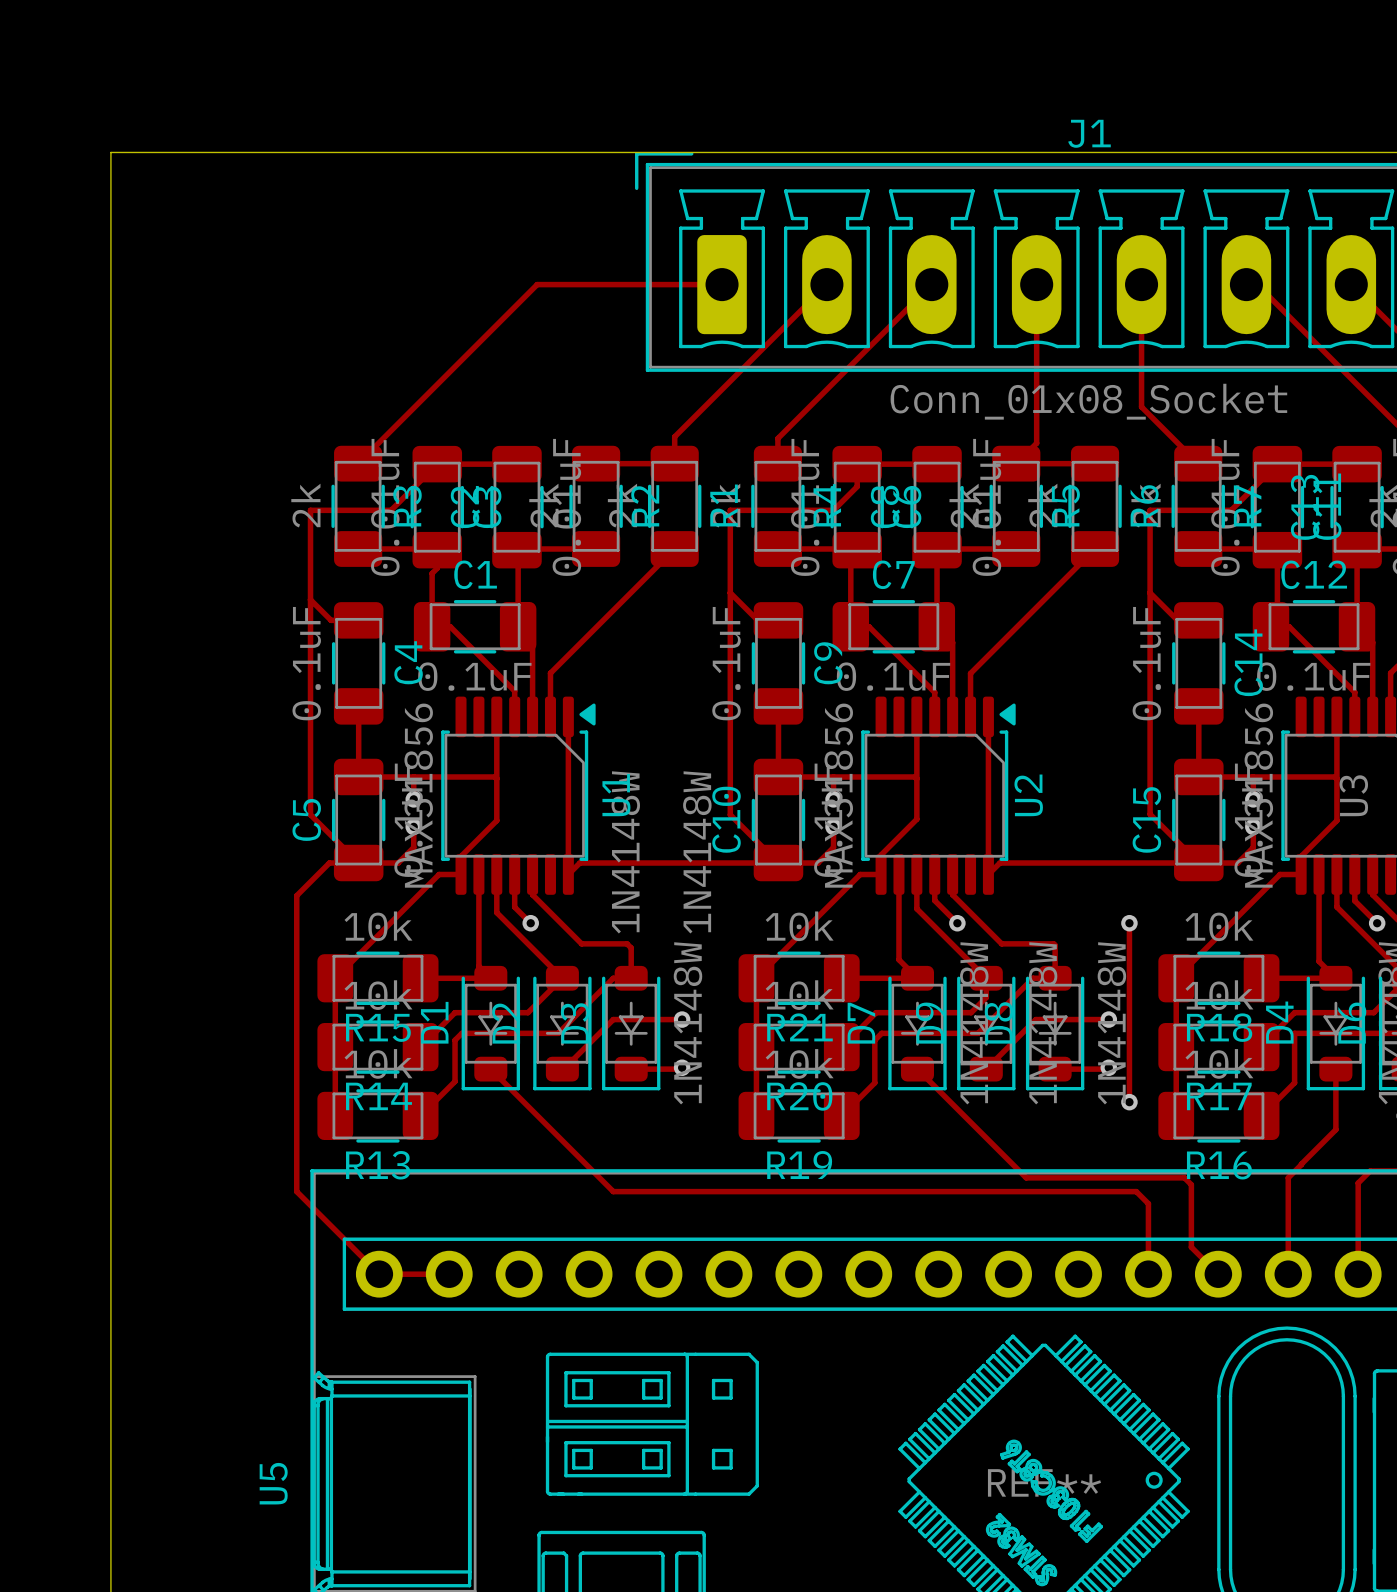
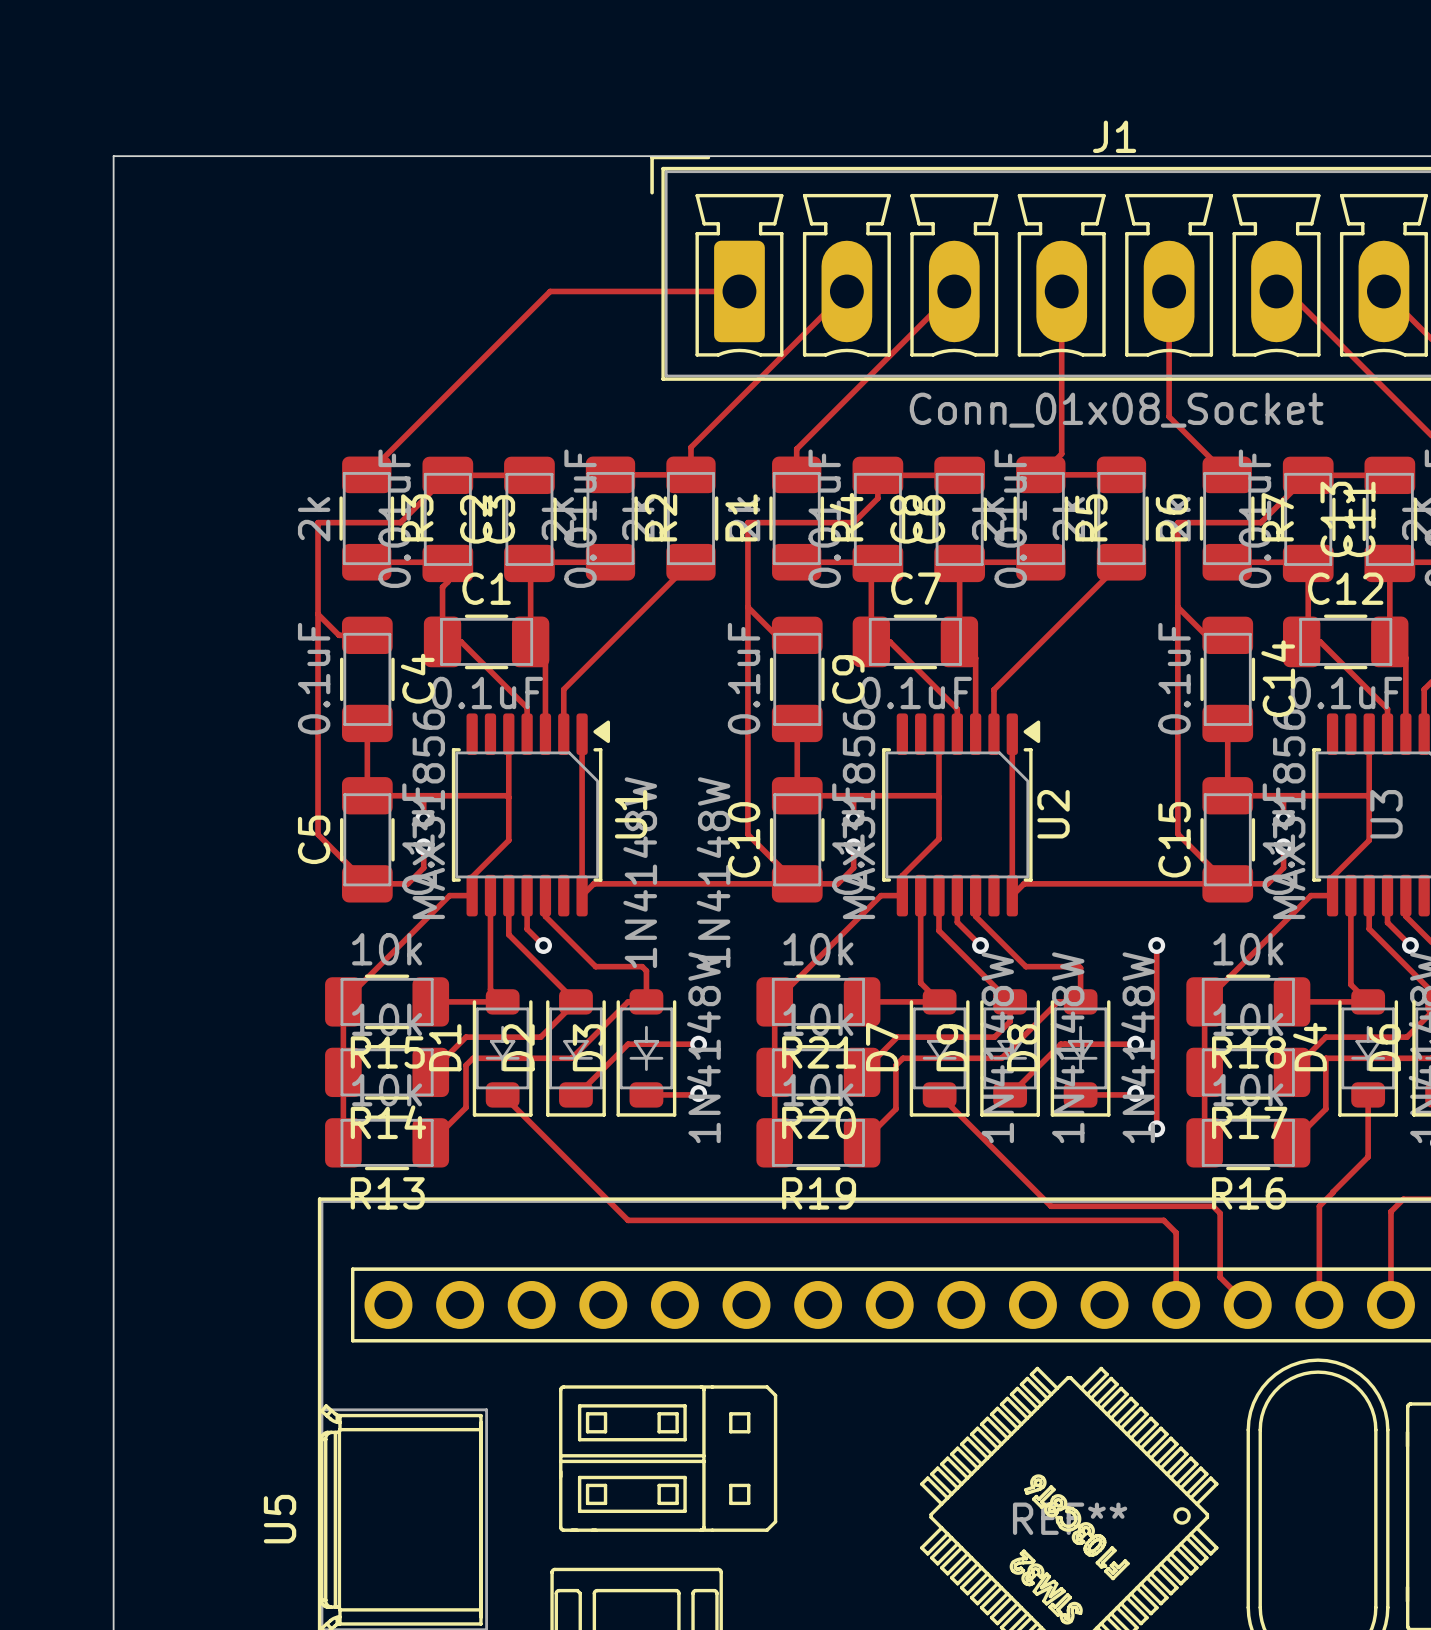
track: (358, 863) (329, 863) (296, 895) (296, 1191) (379, 1274) (449, 1274) -> none

